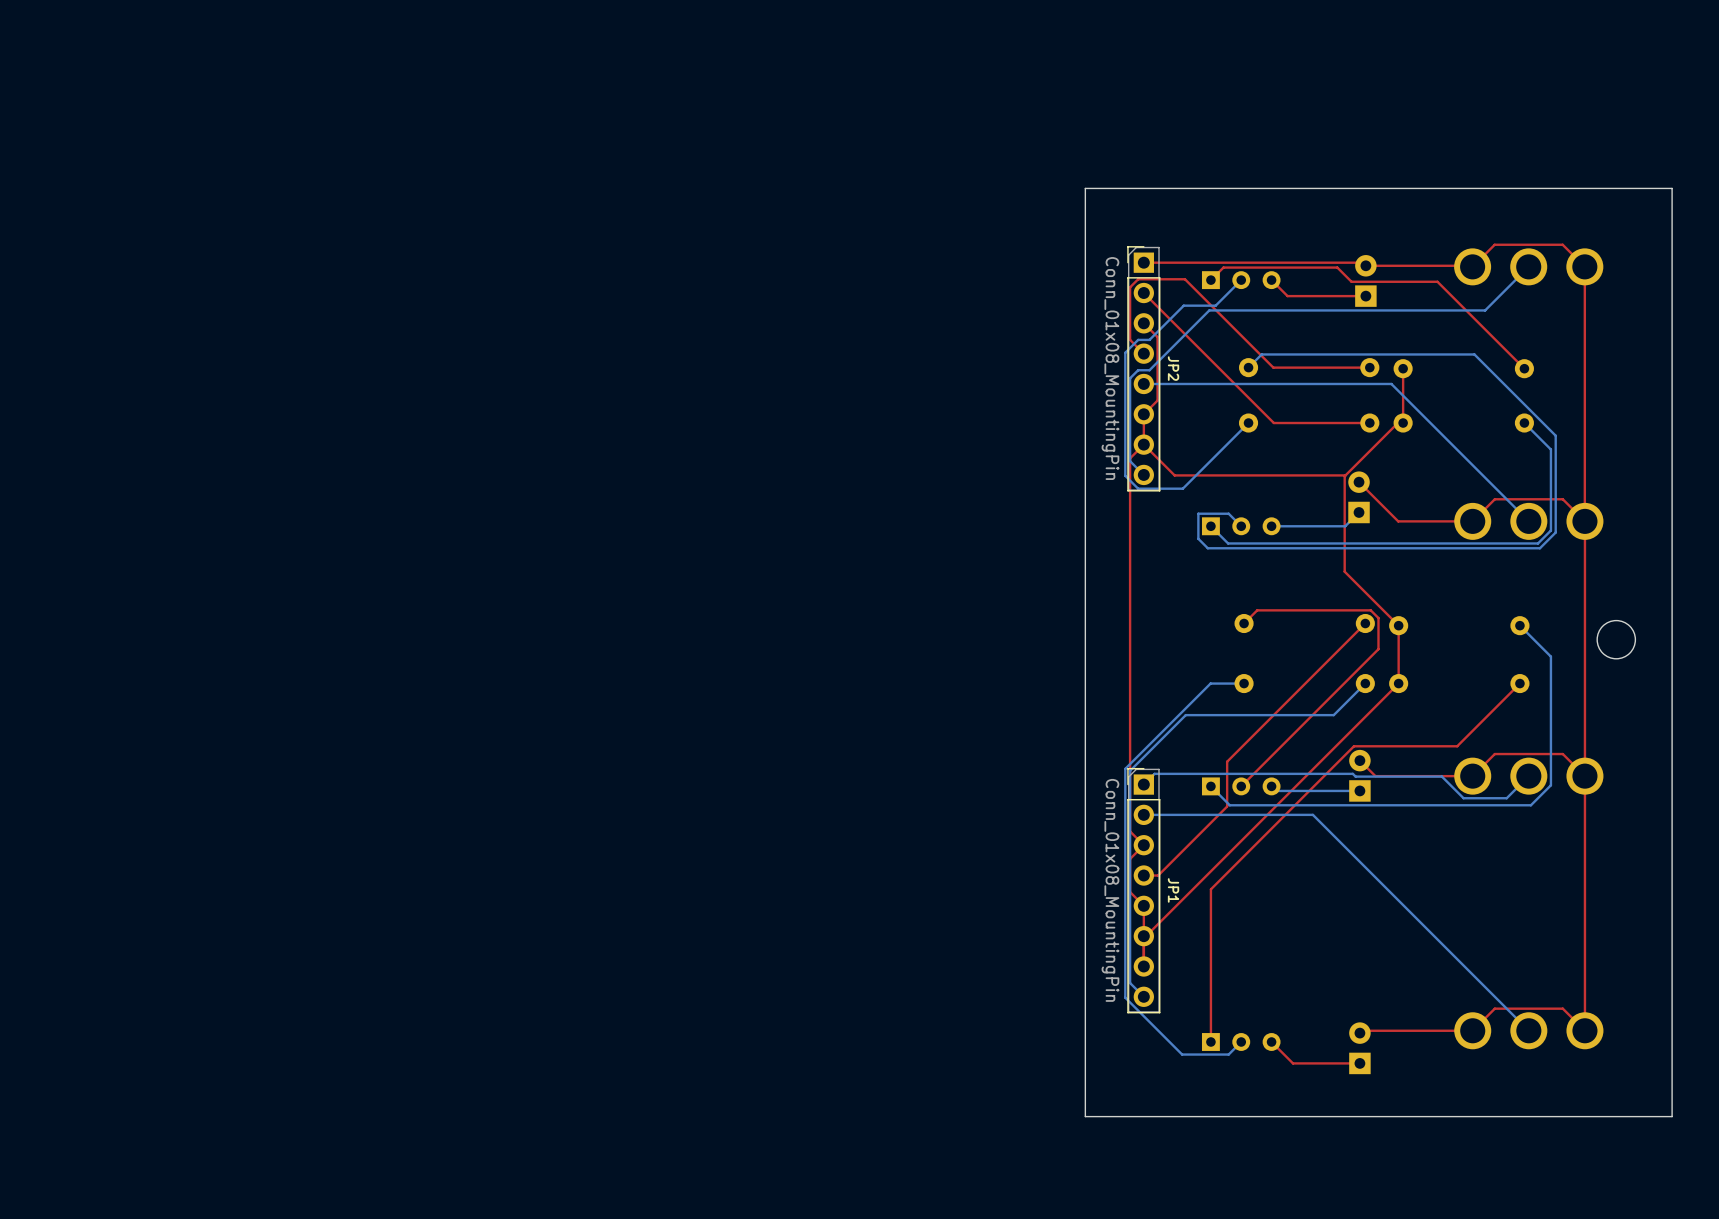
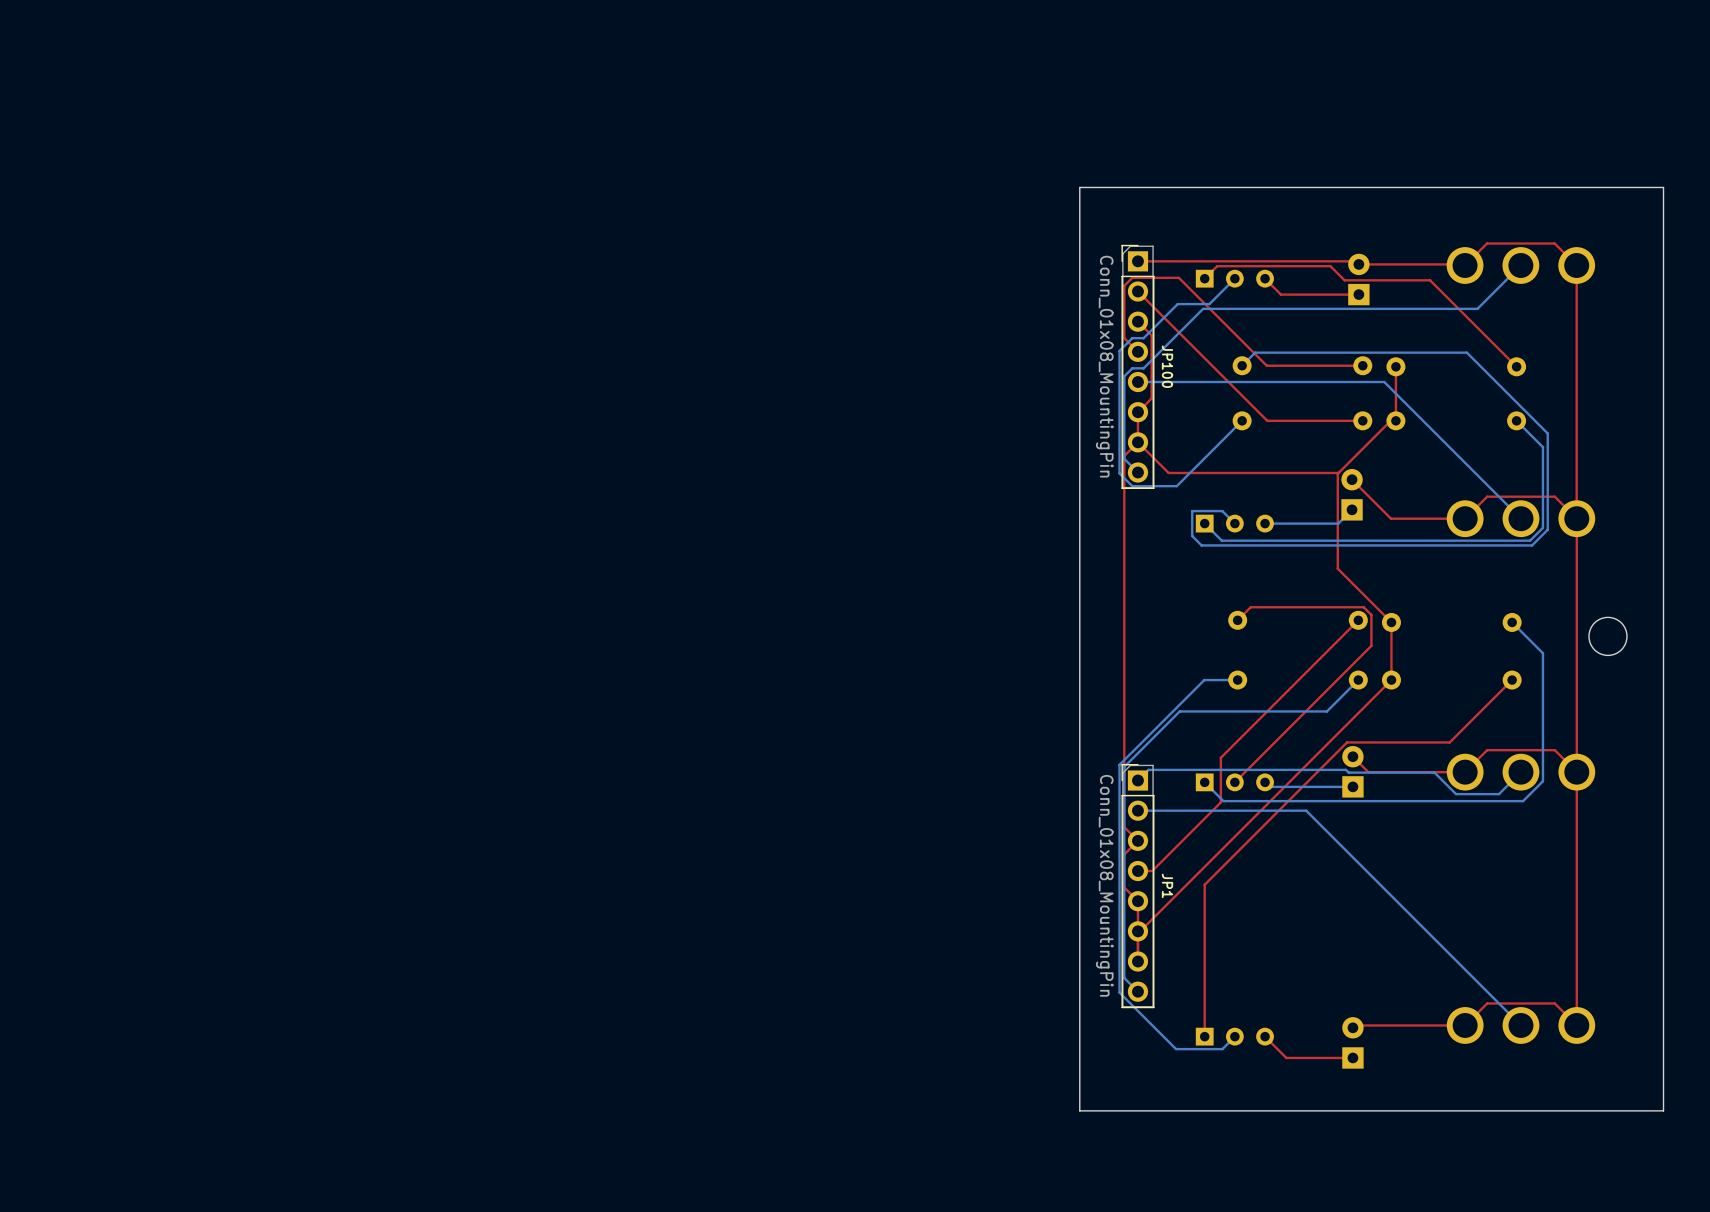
JP2 name: JP2 (1173, 368) -> JP100 (1167, 366)

